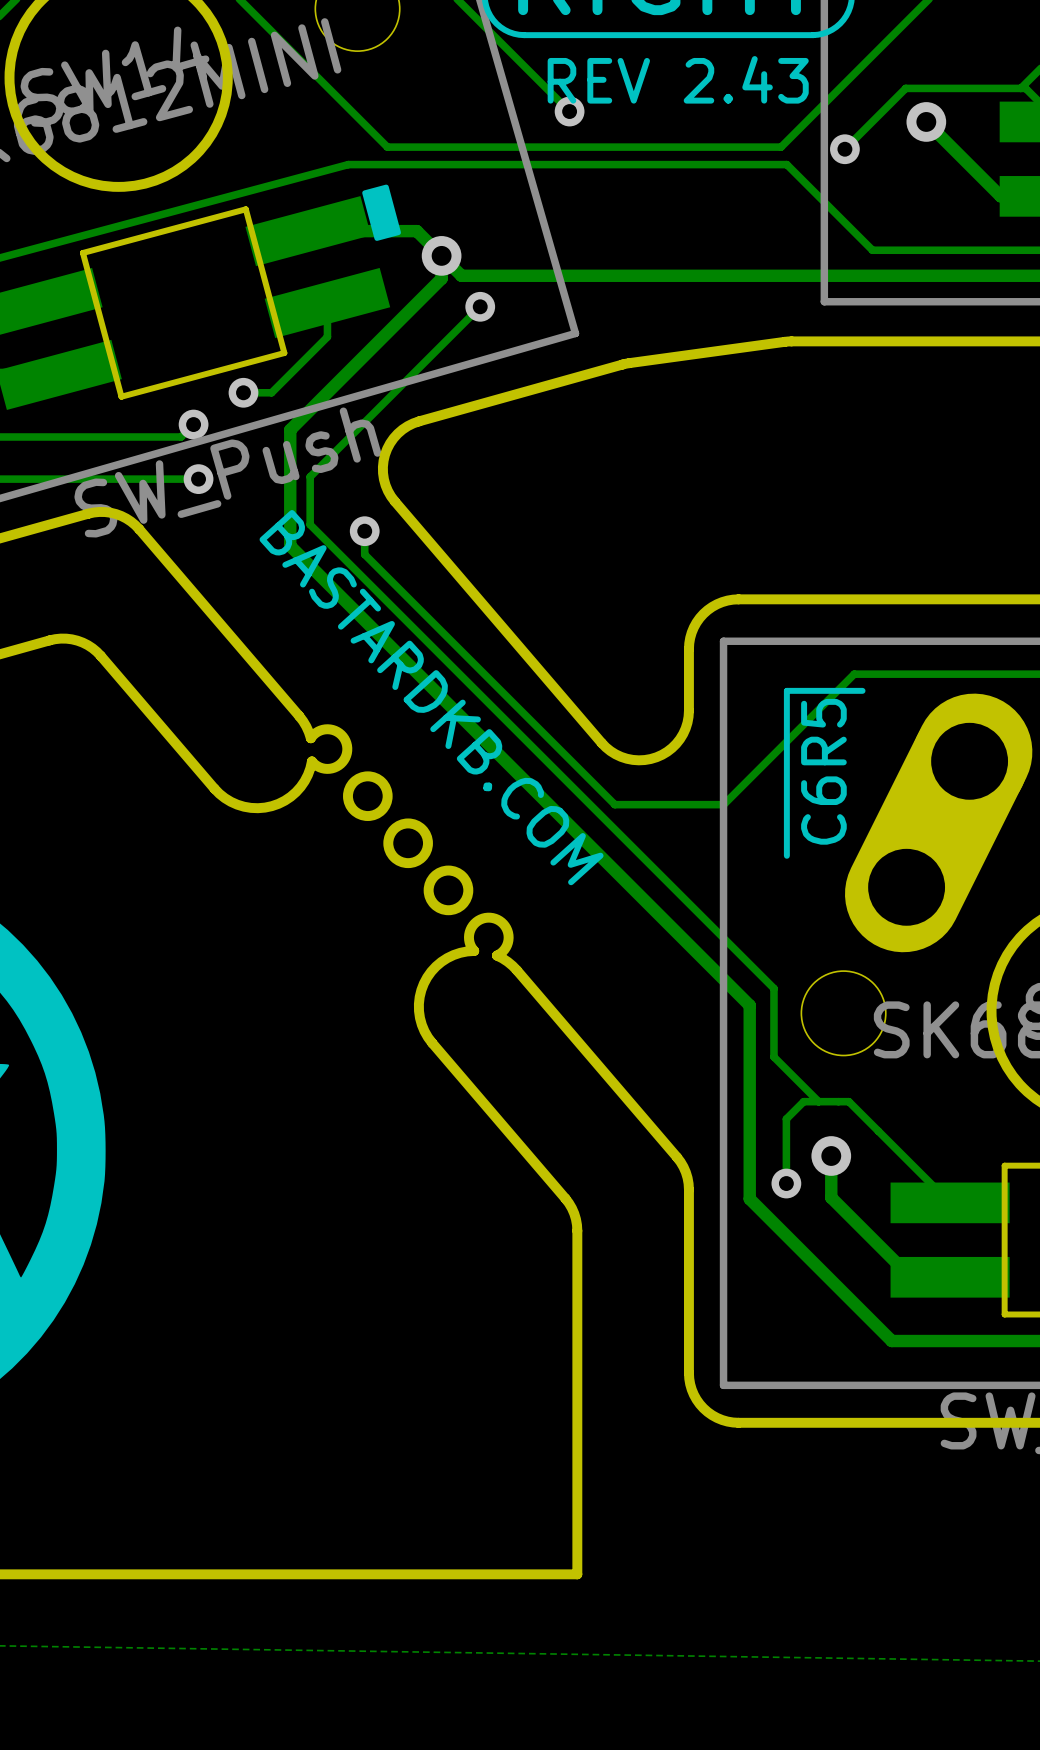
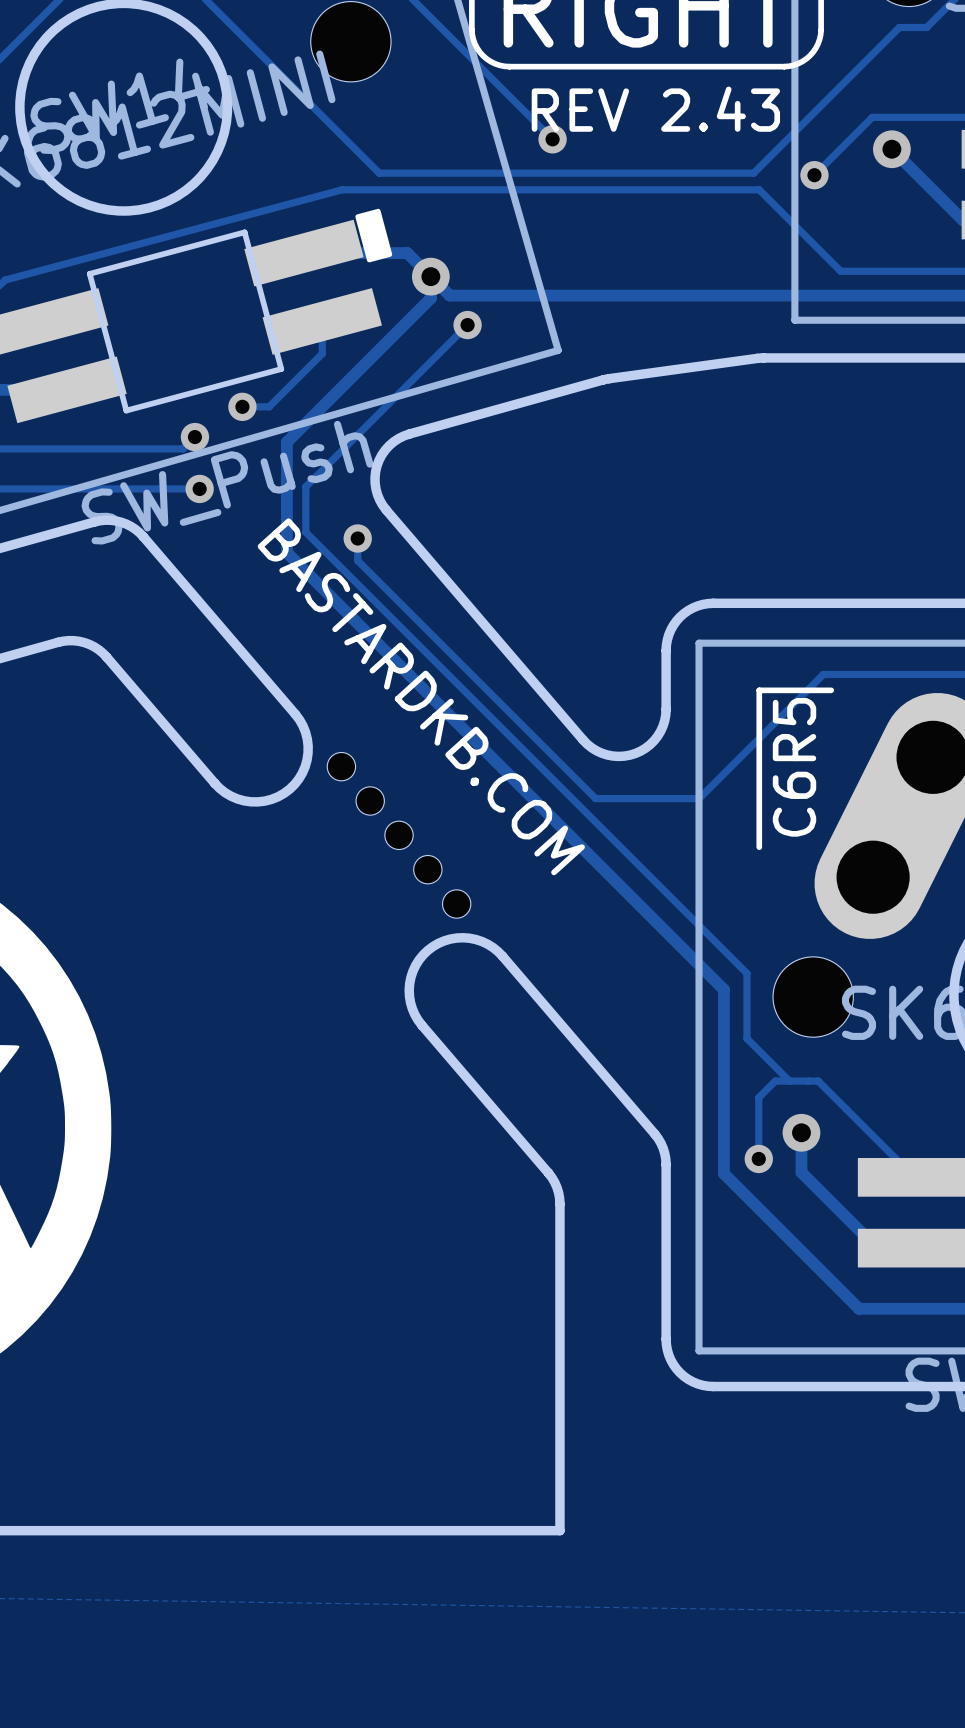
board edge: (299, 716) (310, 738) (316, 732) (325, 729) (335, 730) (342, 736) (347, 750) (340, 763) (327, 768) (317, 766) (311, 761) (304, 781) (296, 792) (284, 800) (265, 807) (250, 807) (237, 804) (224, 798) (214, 788) -> (295, 714) (305, 732) (308, 752) (302, 772) (289, 789) (271, 799) (251, 801) (231, 796) (214, 783)
round board edge: [343, 771, 393, 821] -> none
round board edge: [383, 818, 433, 869] -> none
part: none -> (399, 835)
round board edge: [423, 865, 474, 916] -> none
board edge: (517, 970) (496, 955) (504, 949) (508, 940) (508, 932) (503, 924) (490, 917) (476, 922) (469, 934) (469, 942) (474, 950) (453, 955) (441, 961) (431, 971) (421, 990) (418, 1004) (419, 1018) (424, 1031) (432, 1043) -> (502, 956) (487, 944) (469, 938) (450, 939) (438, 943) (427, 950) (415, 965) (410, 977) (409, 989) (412, 1008) (421, 1025)

